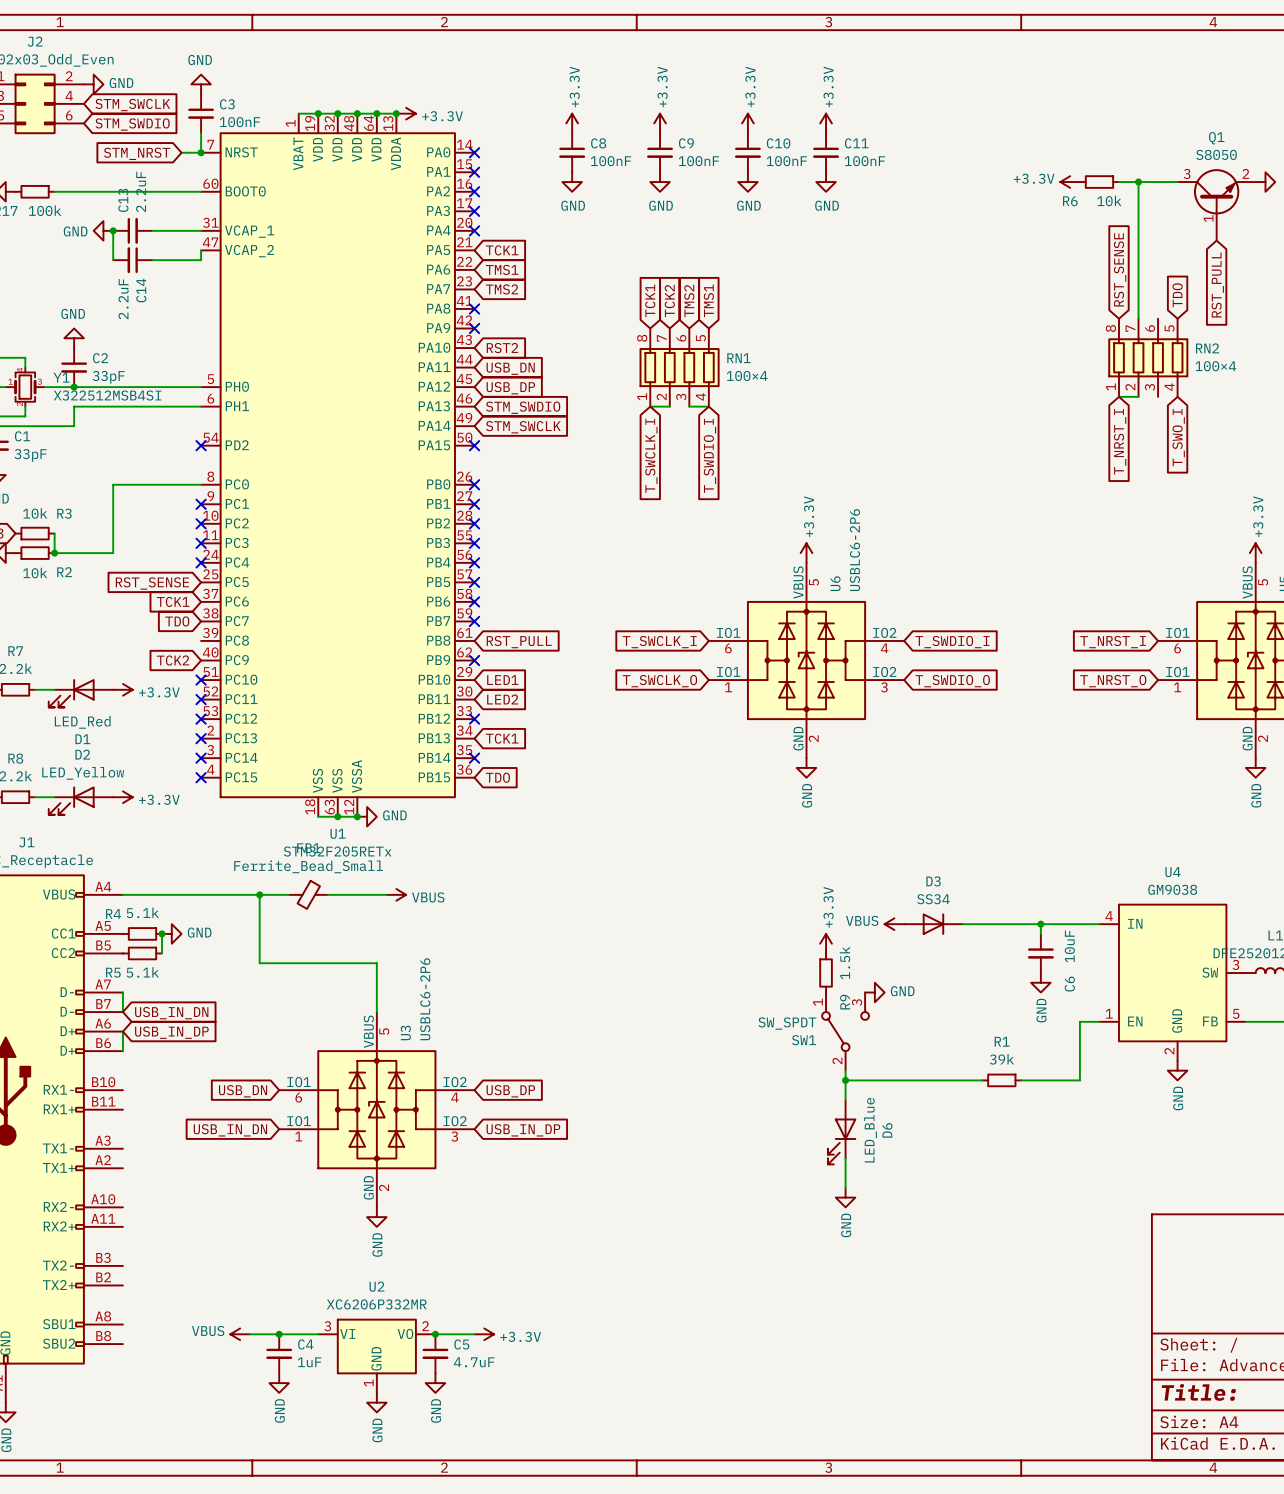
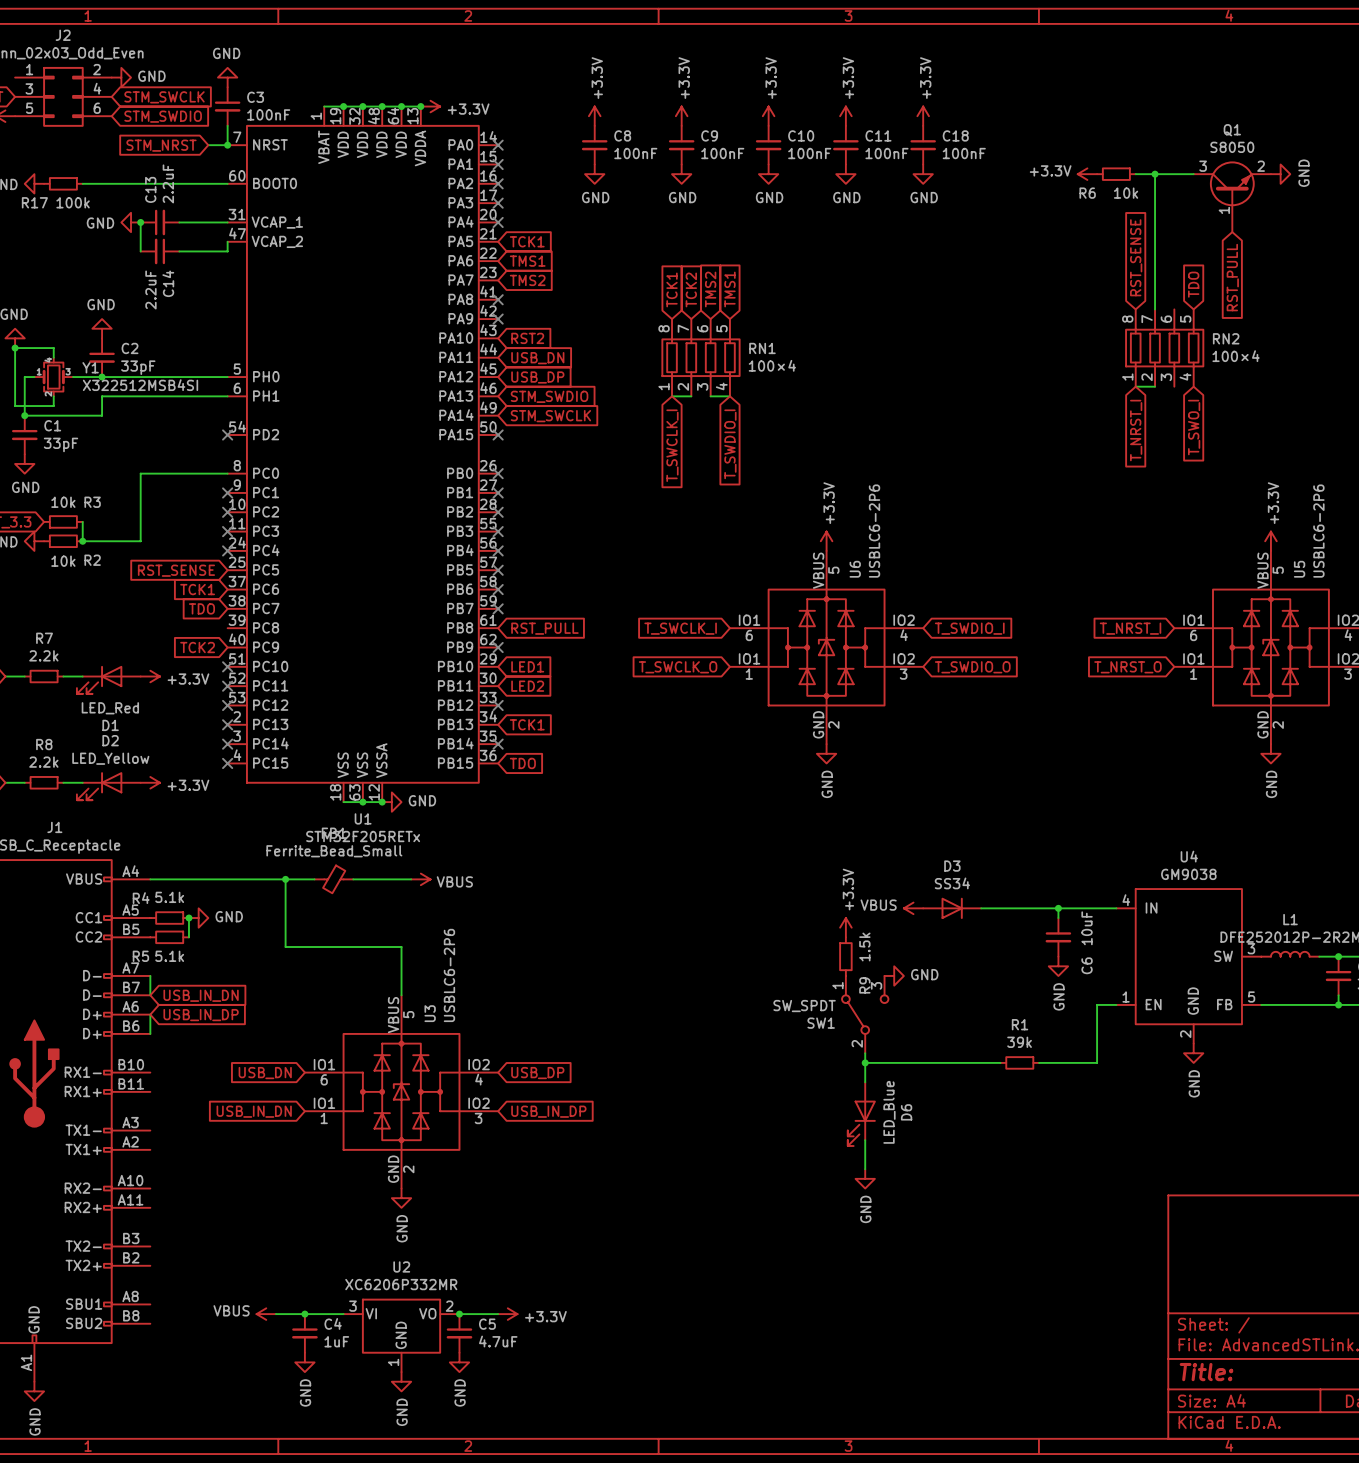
power symbol: none -> +3.3V (923, 116)
C18: none -> 100nF (923, 145)
power symbol: none -> GND (923, 174)

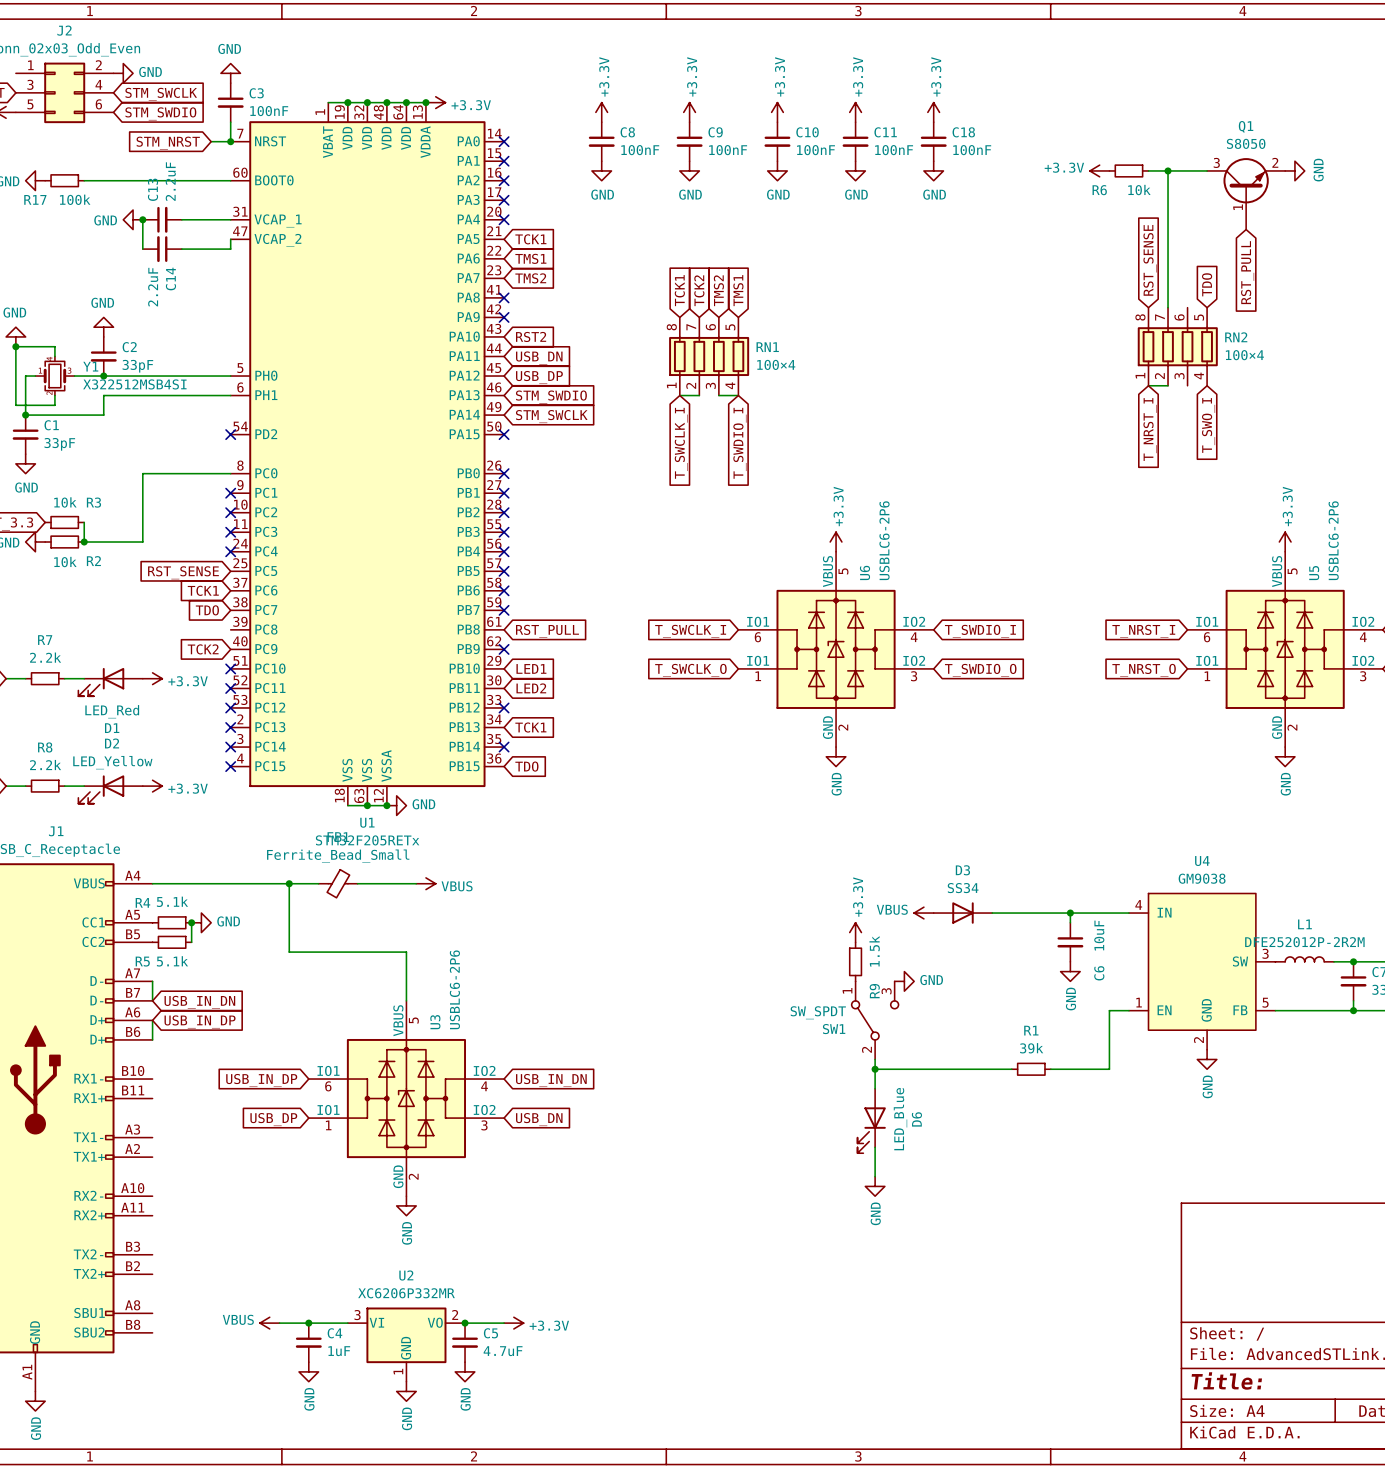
global label: USB_DN (265, 1073) -> USB_IN_DP (261, 1080)
global label: USB_DP (537, 1073) -> USB_IN_DN (551, 1080)
global label: USB_IN_DN (254, 1111) -> USB_DP (273, 1119)
global label: USB_IN_DP (548, 1111) -> USB_DN (539, 1119)

